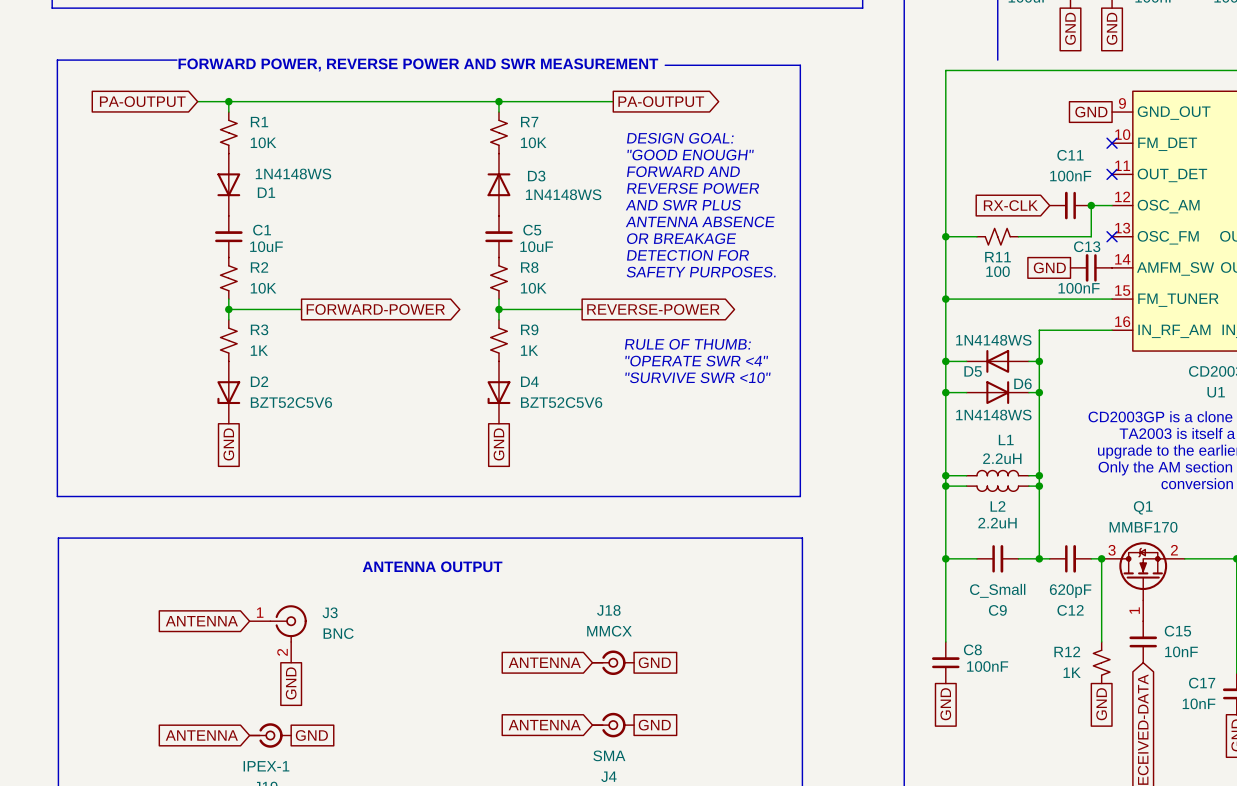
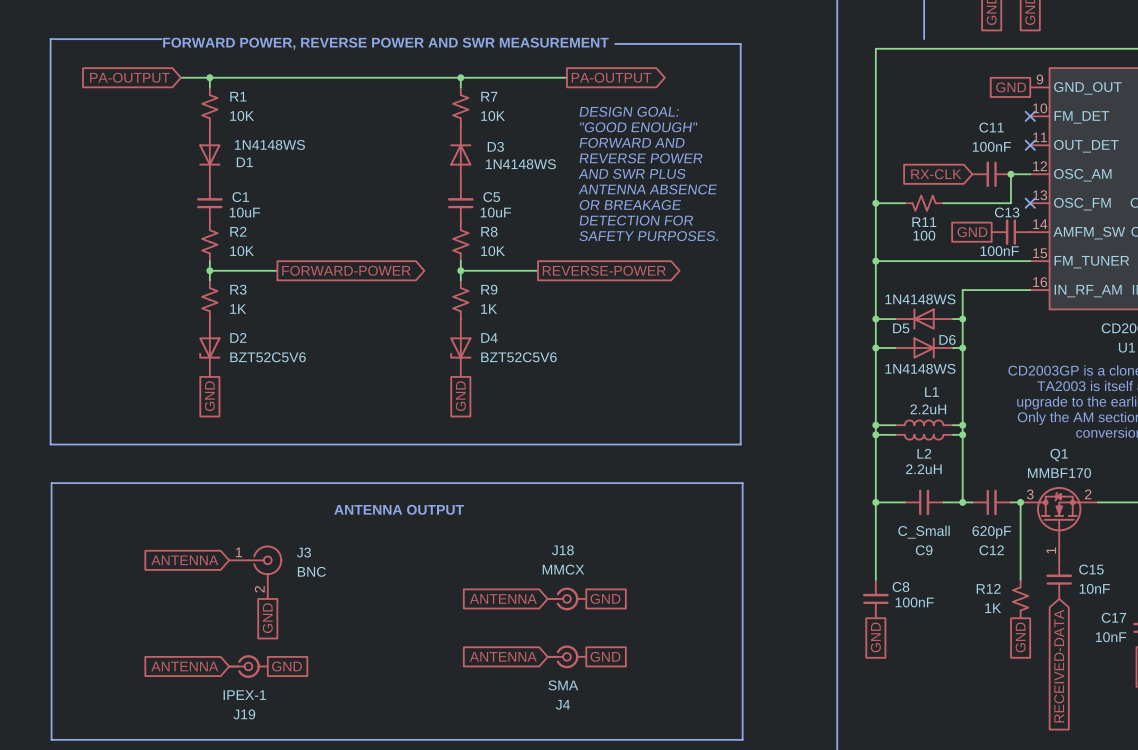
text: RULE OF THUMB: (687, 344) -> none
text: "OPERATE SWR <4" (696, 361) -> none
text: "SURVIVE SWR <10" (697, 377) -> none

